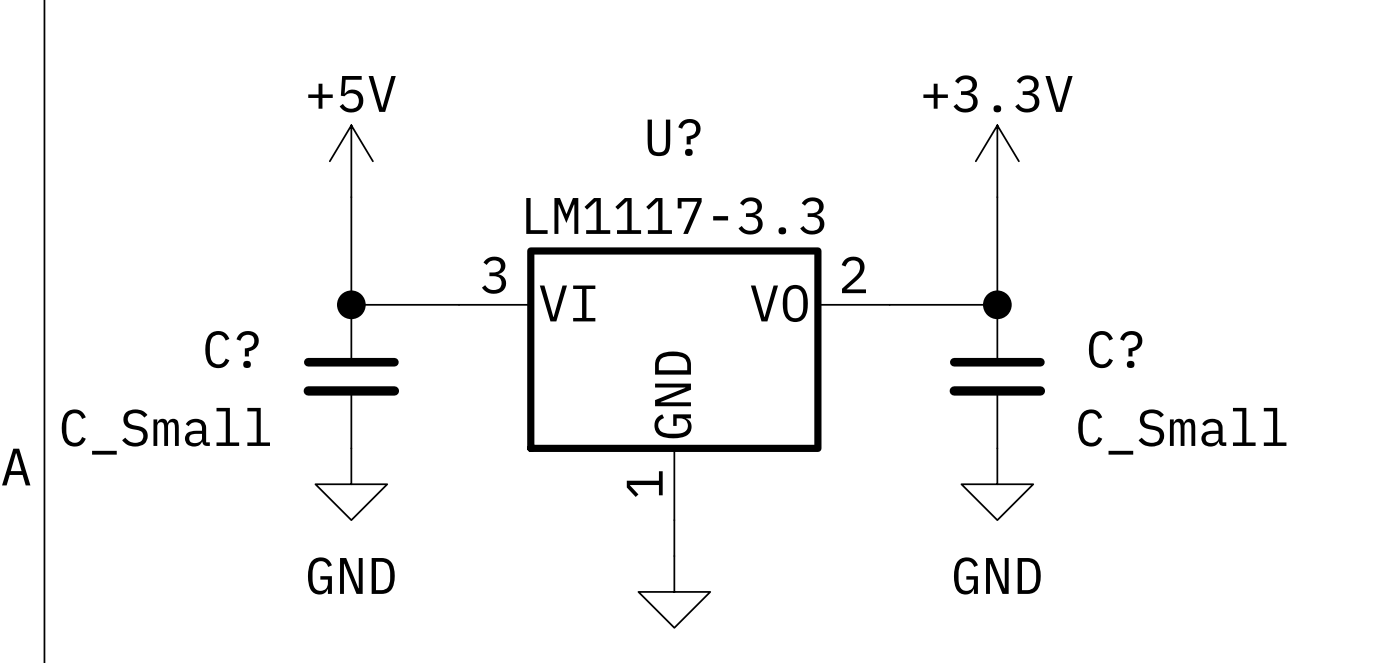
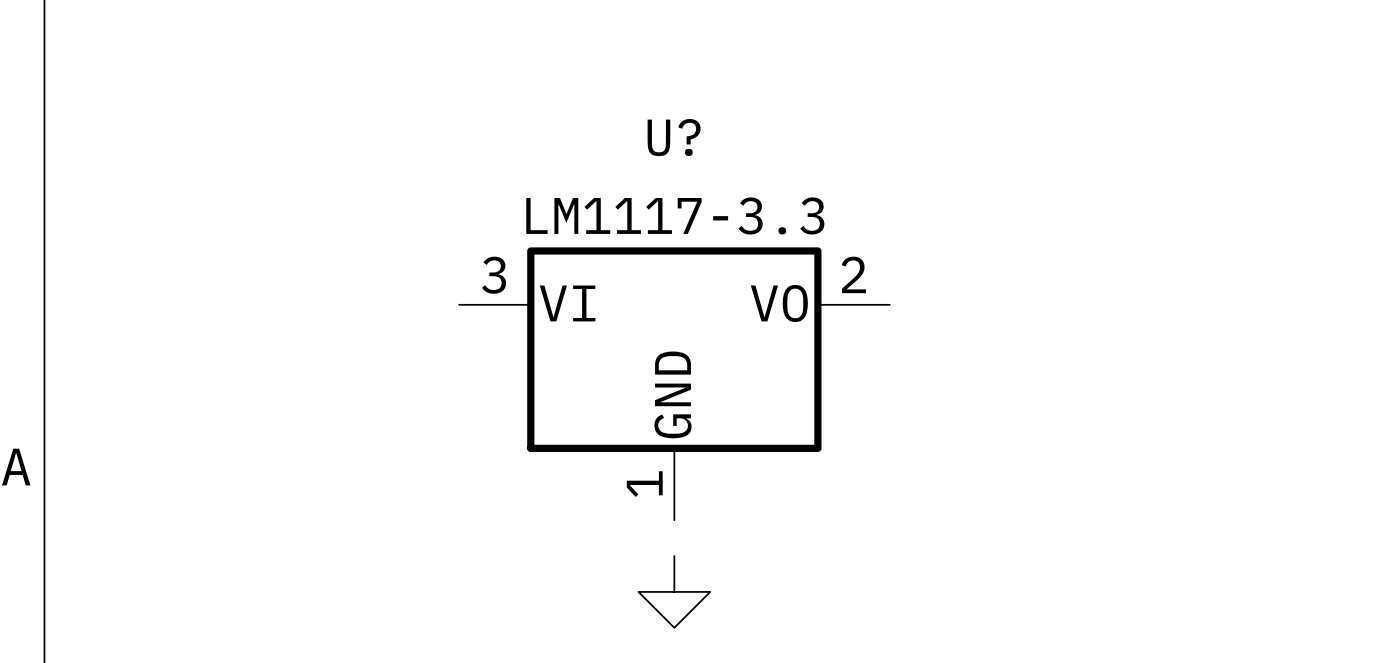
power symbol: +5V (351, 161) -> none
power symbol: +3.3V (997, 161) -> none
wire: (351, 197) (351, 304) (459, 304) -> none
wire: (997, 197) (997, 304) (889, 304) -> none
junction: (351, 304) -> none
junction: (997, 304) -> none
C?: C_Small (351, 376) -> none
C?: C_Small (997, 376) -> none
power symbol: GND (351, 484) -> none
power symbol: GND (997, 484) -> none
wire: (674, 520) (674, 556) -> none

